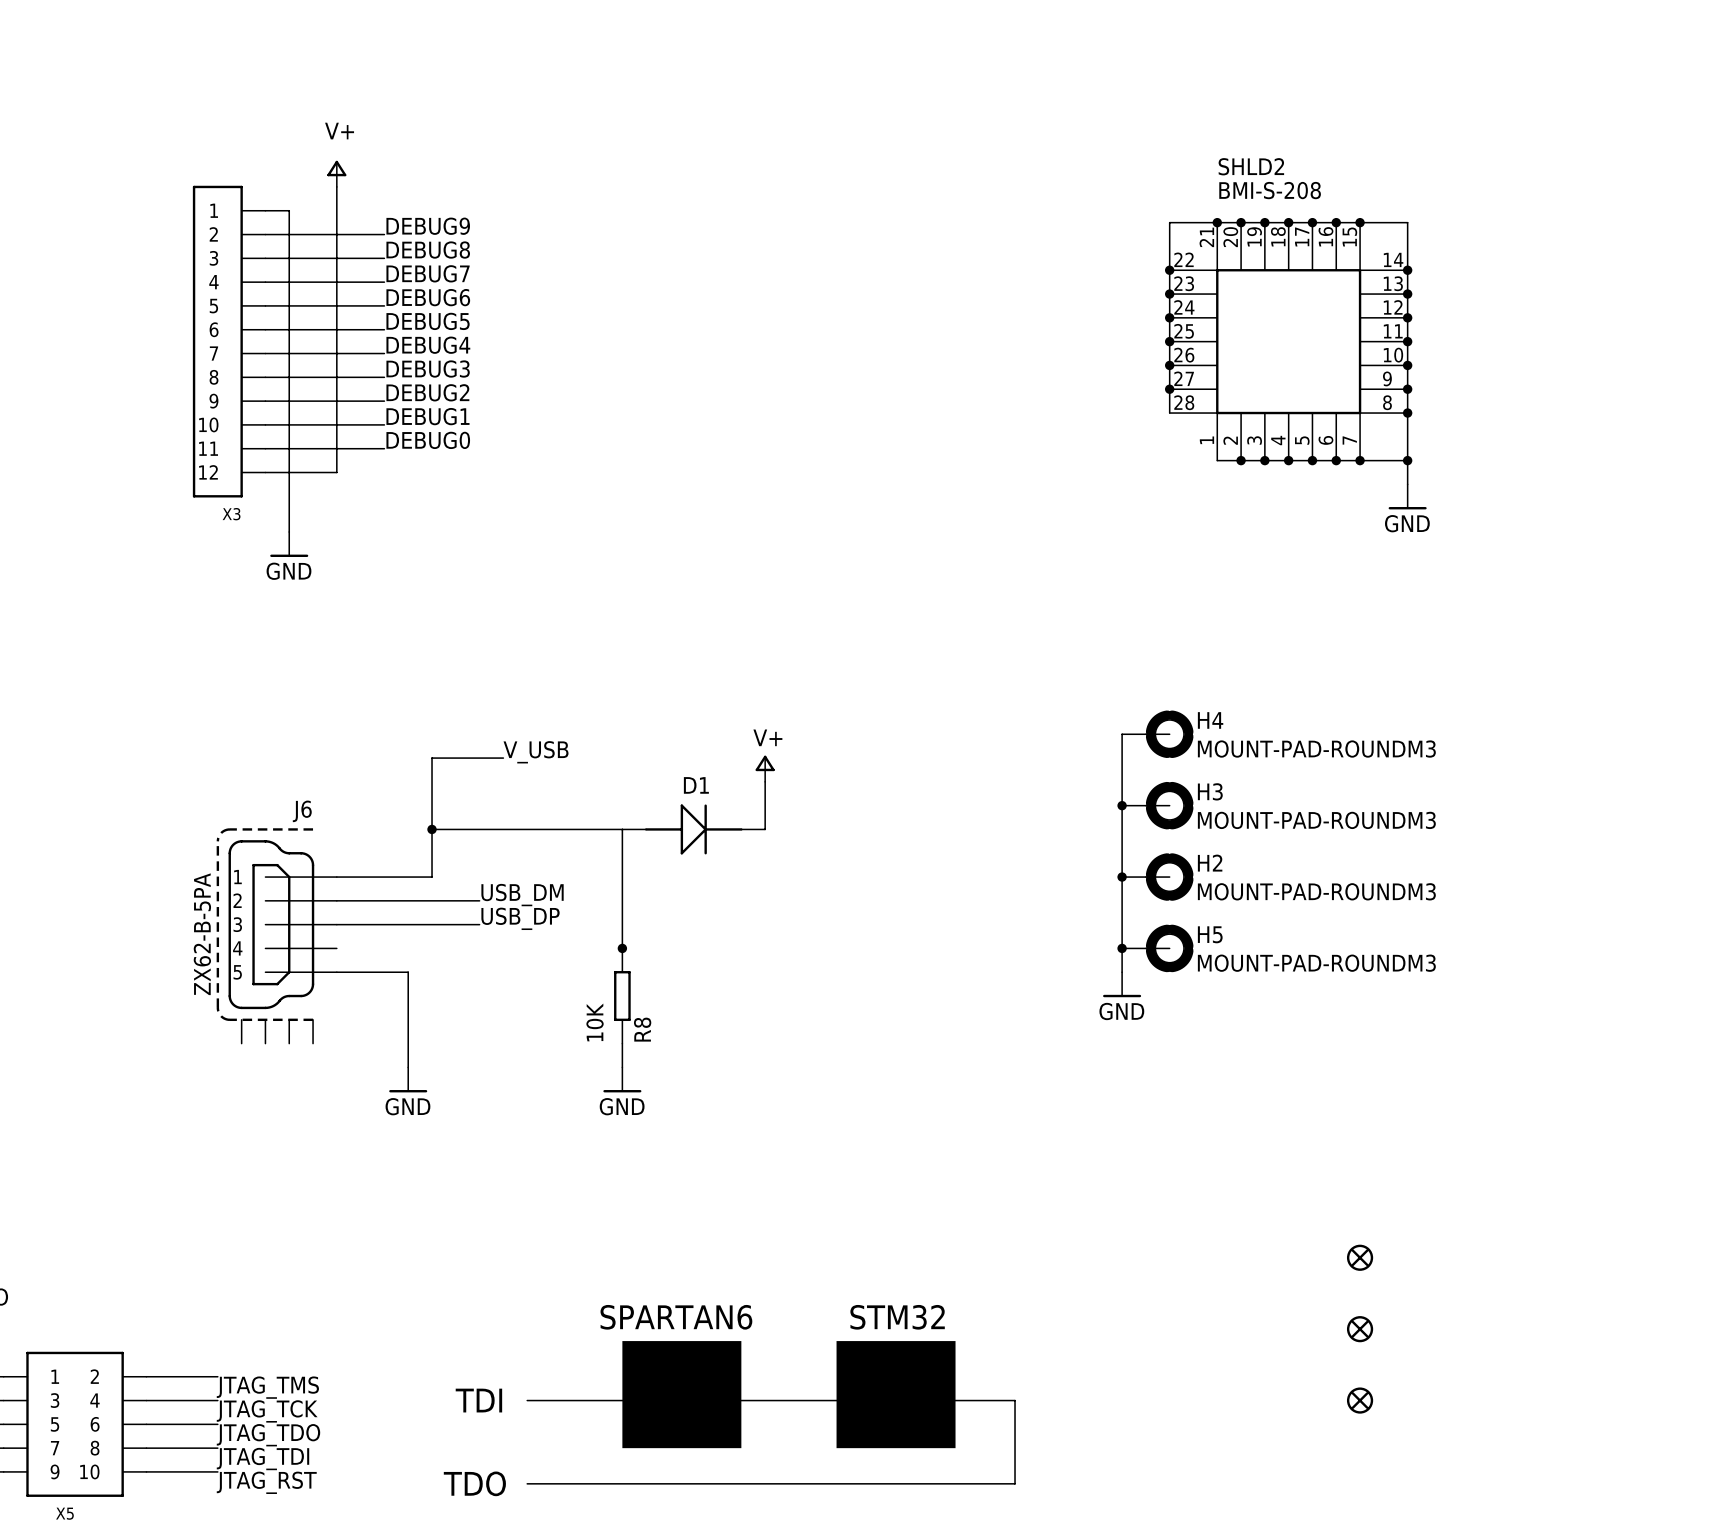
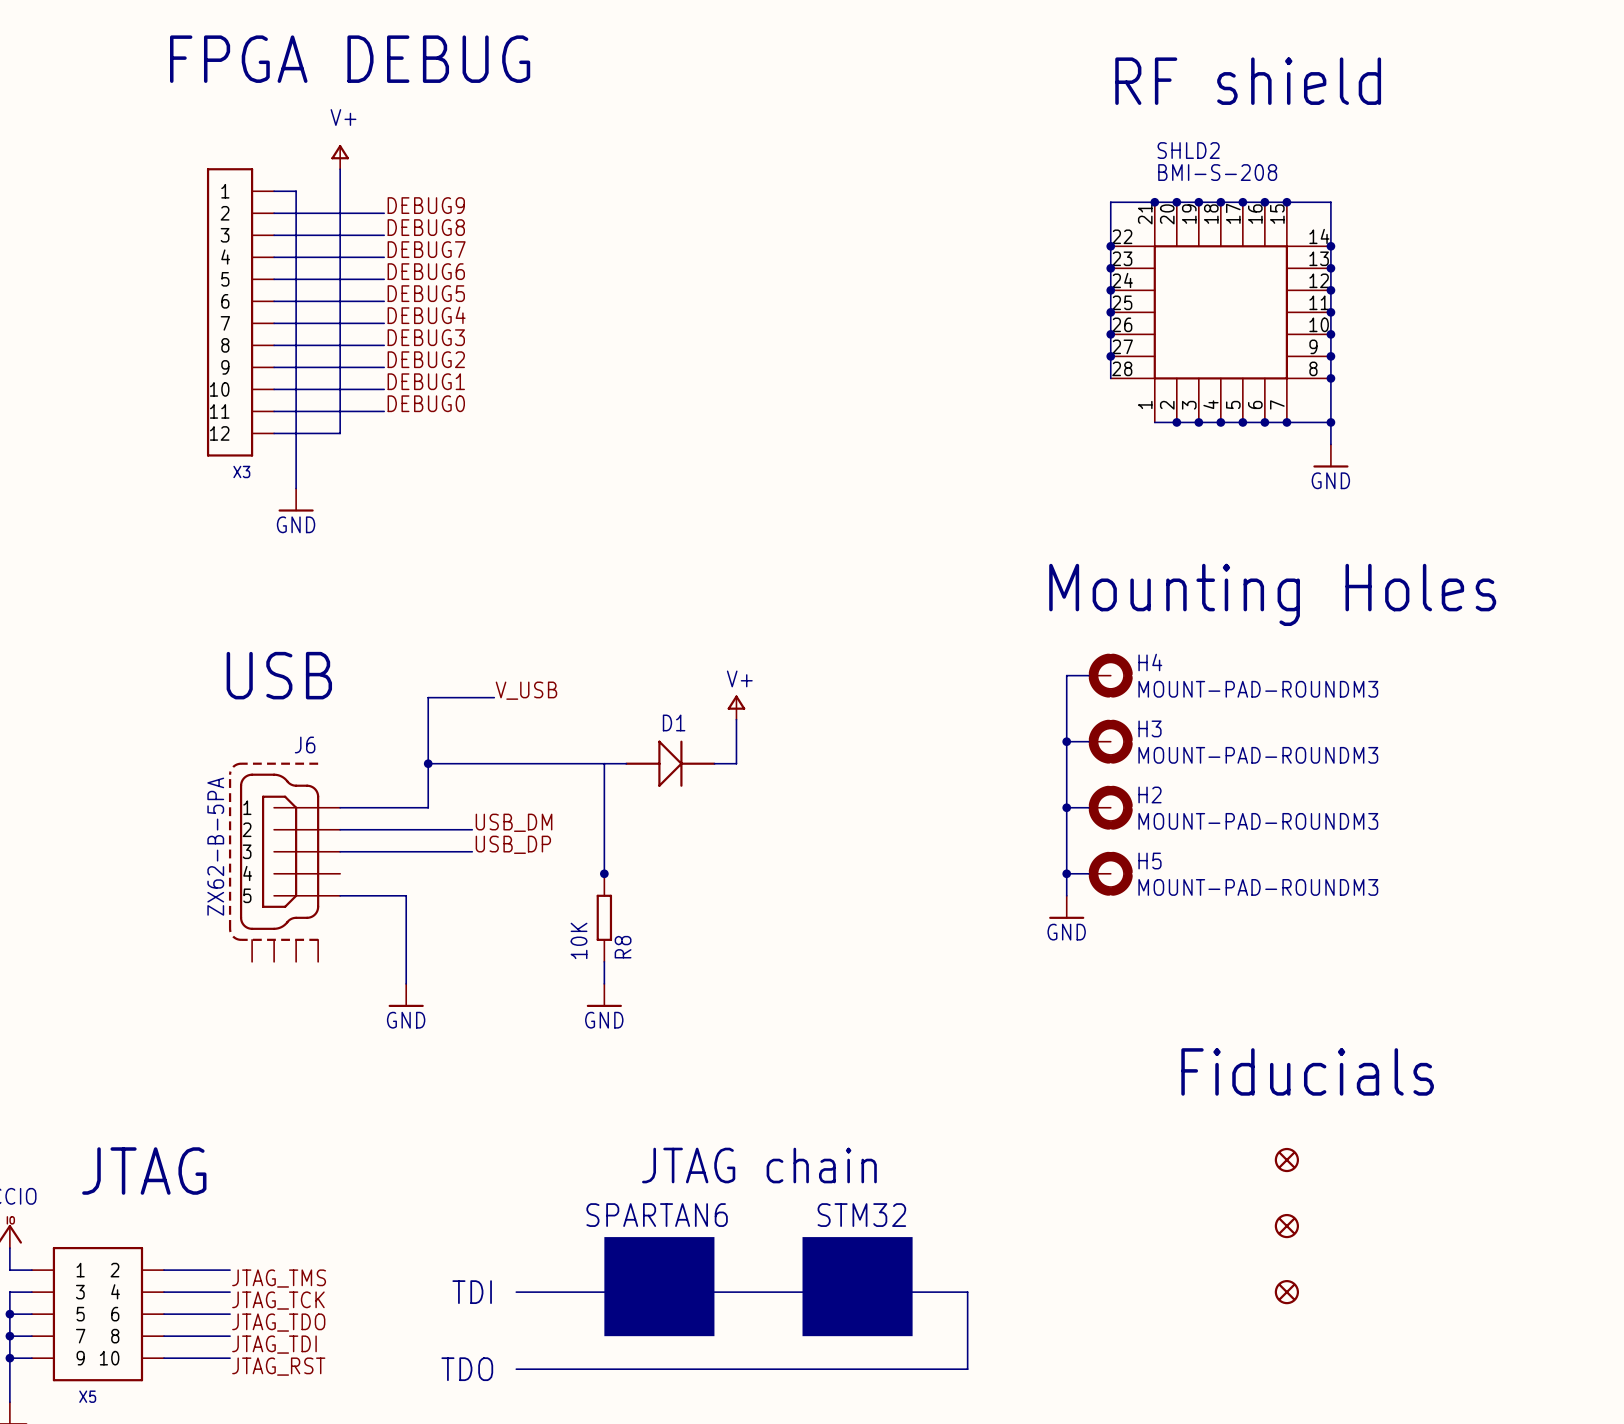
X3 value: none -> FPGA DEBUG (350, 59)
text: none -> RF shield (1248, 81)
text: none -> Mounting Holes (1272, 594)
text: none -> USB (279, 675)
text: none -> Fiducials (1307, 1071)
text: none -> JTAG chain (759, 1165)
text: none -> JTAG (144, 1171)

